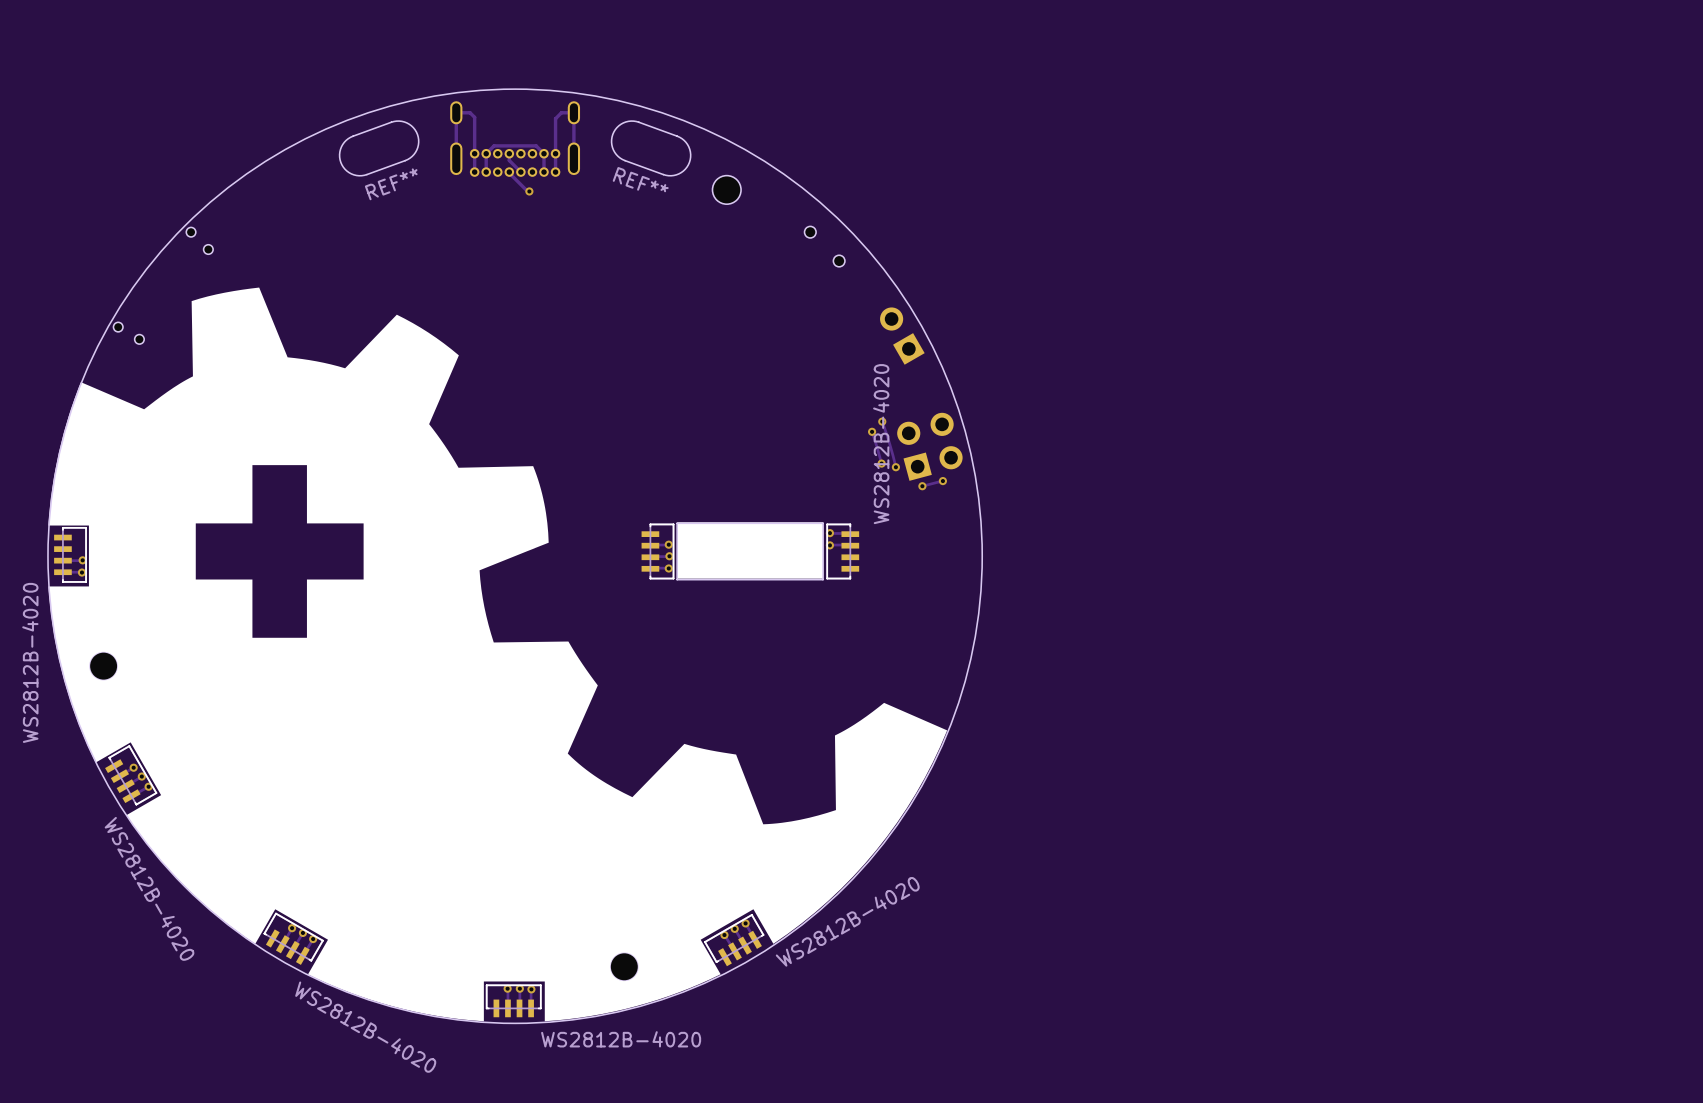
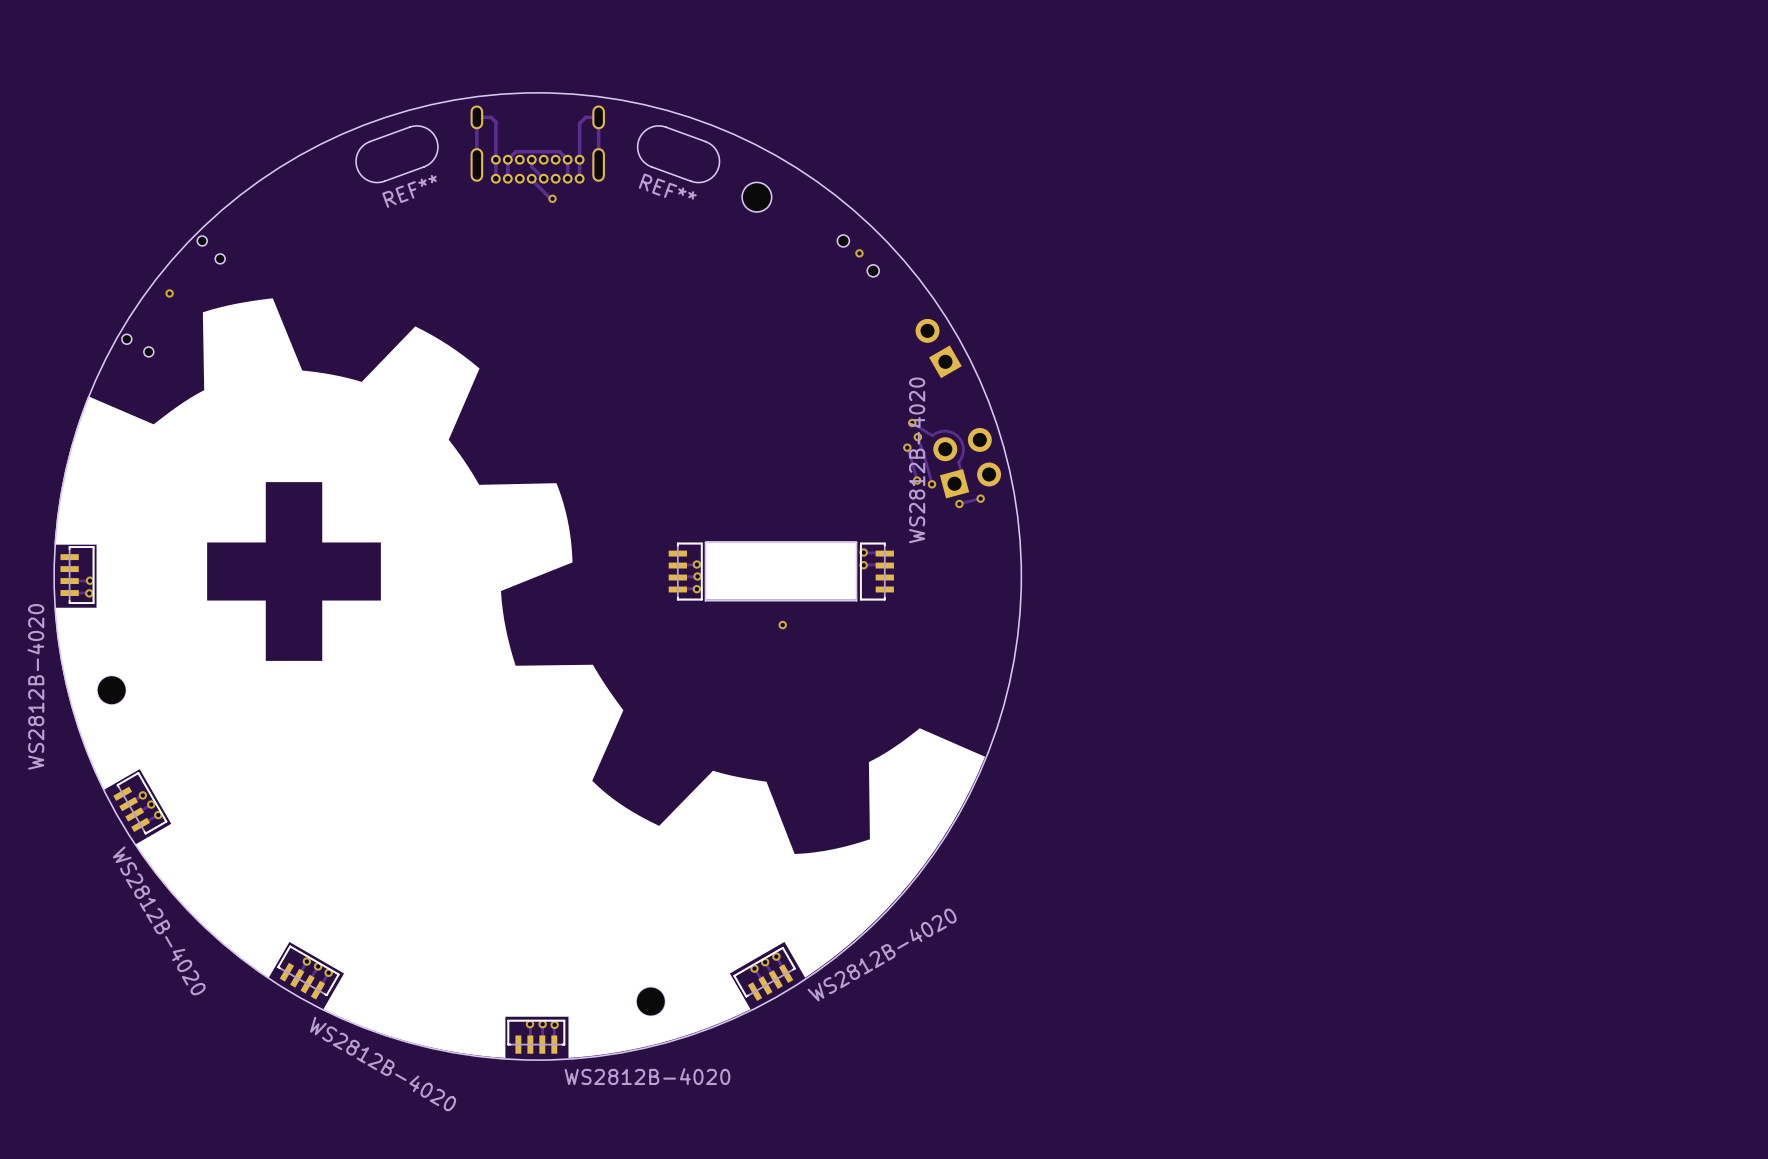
via: none -> (859, 253)
via: none -> (169, 293)
track: none -> (912, 423) (932, 435) (945, 431) (952, 432) (959, 438) (963, 449) (958, 462) (963, 481)
via: none -> (912, 423)
via: none -> (782, 625)

